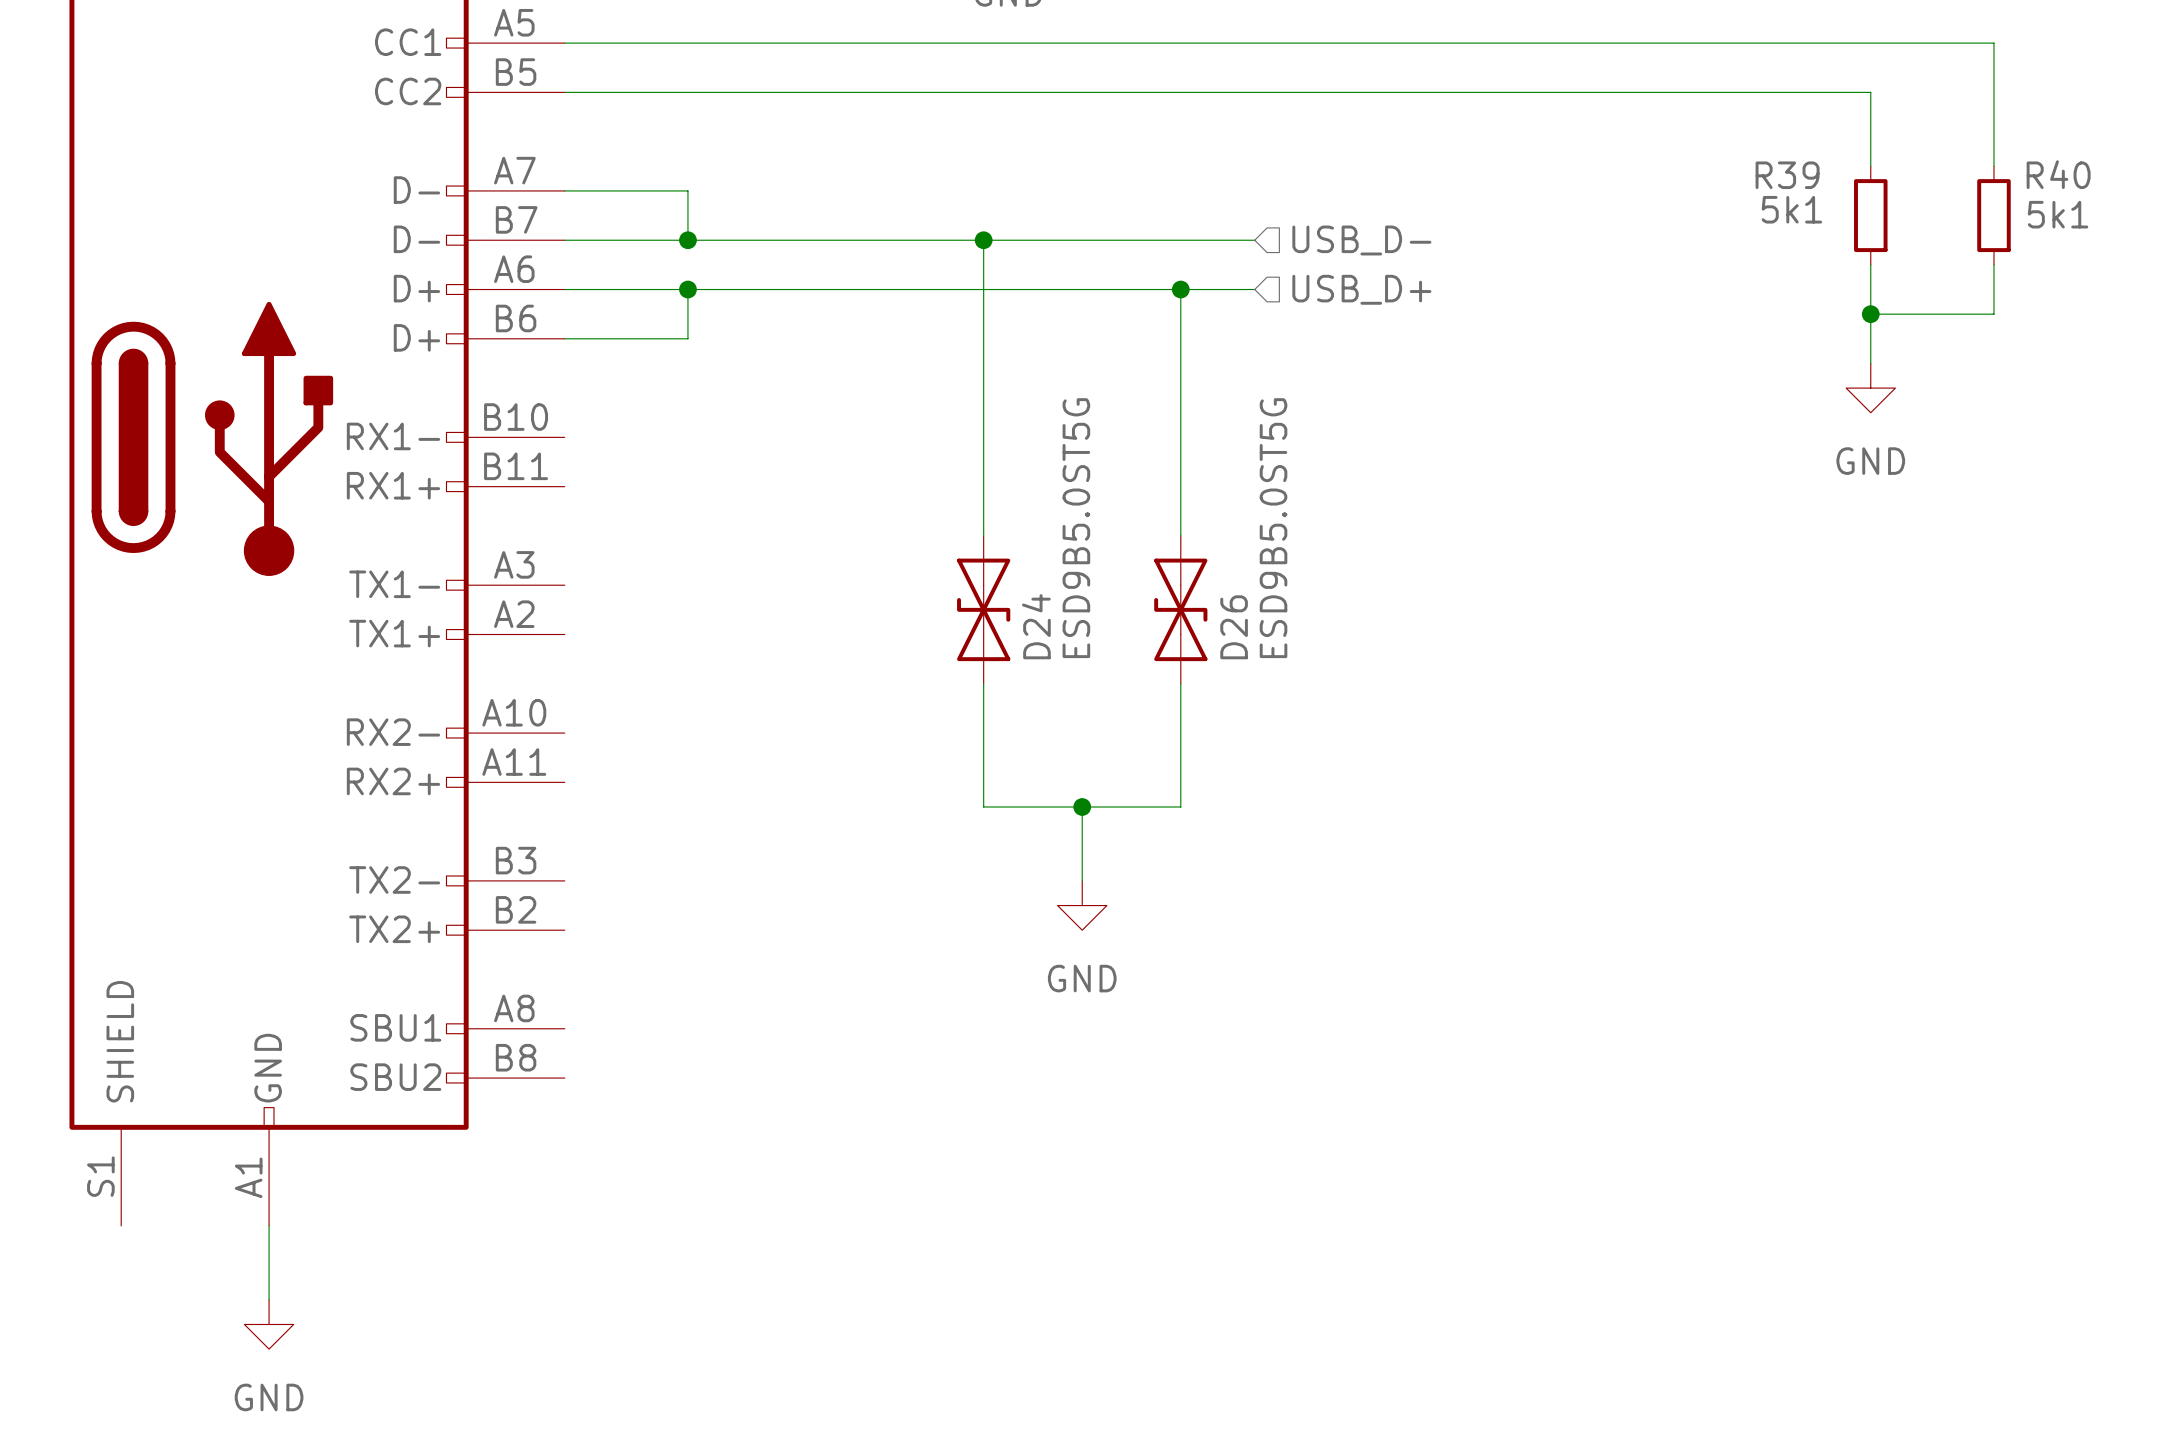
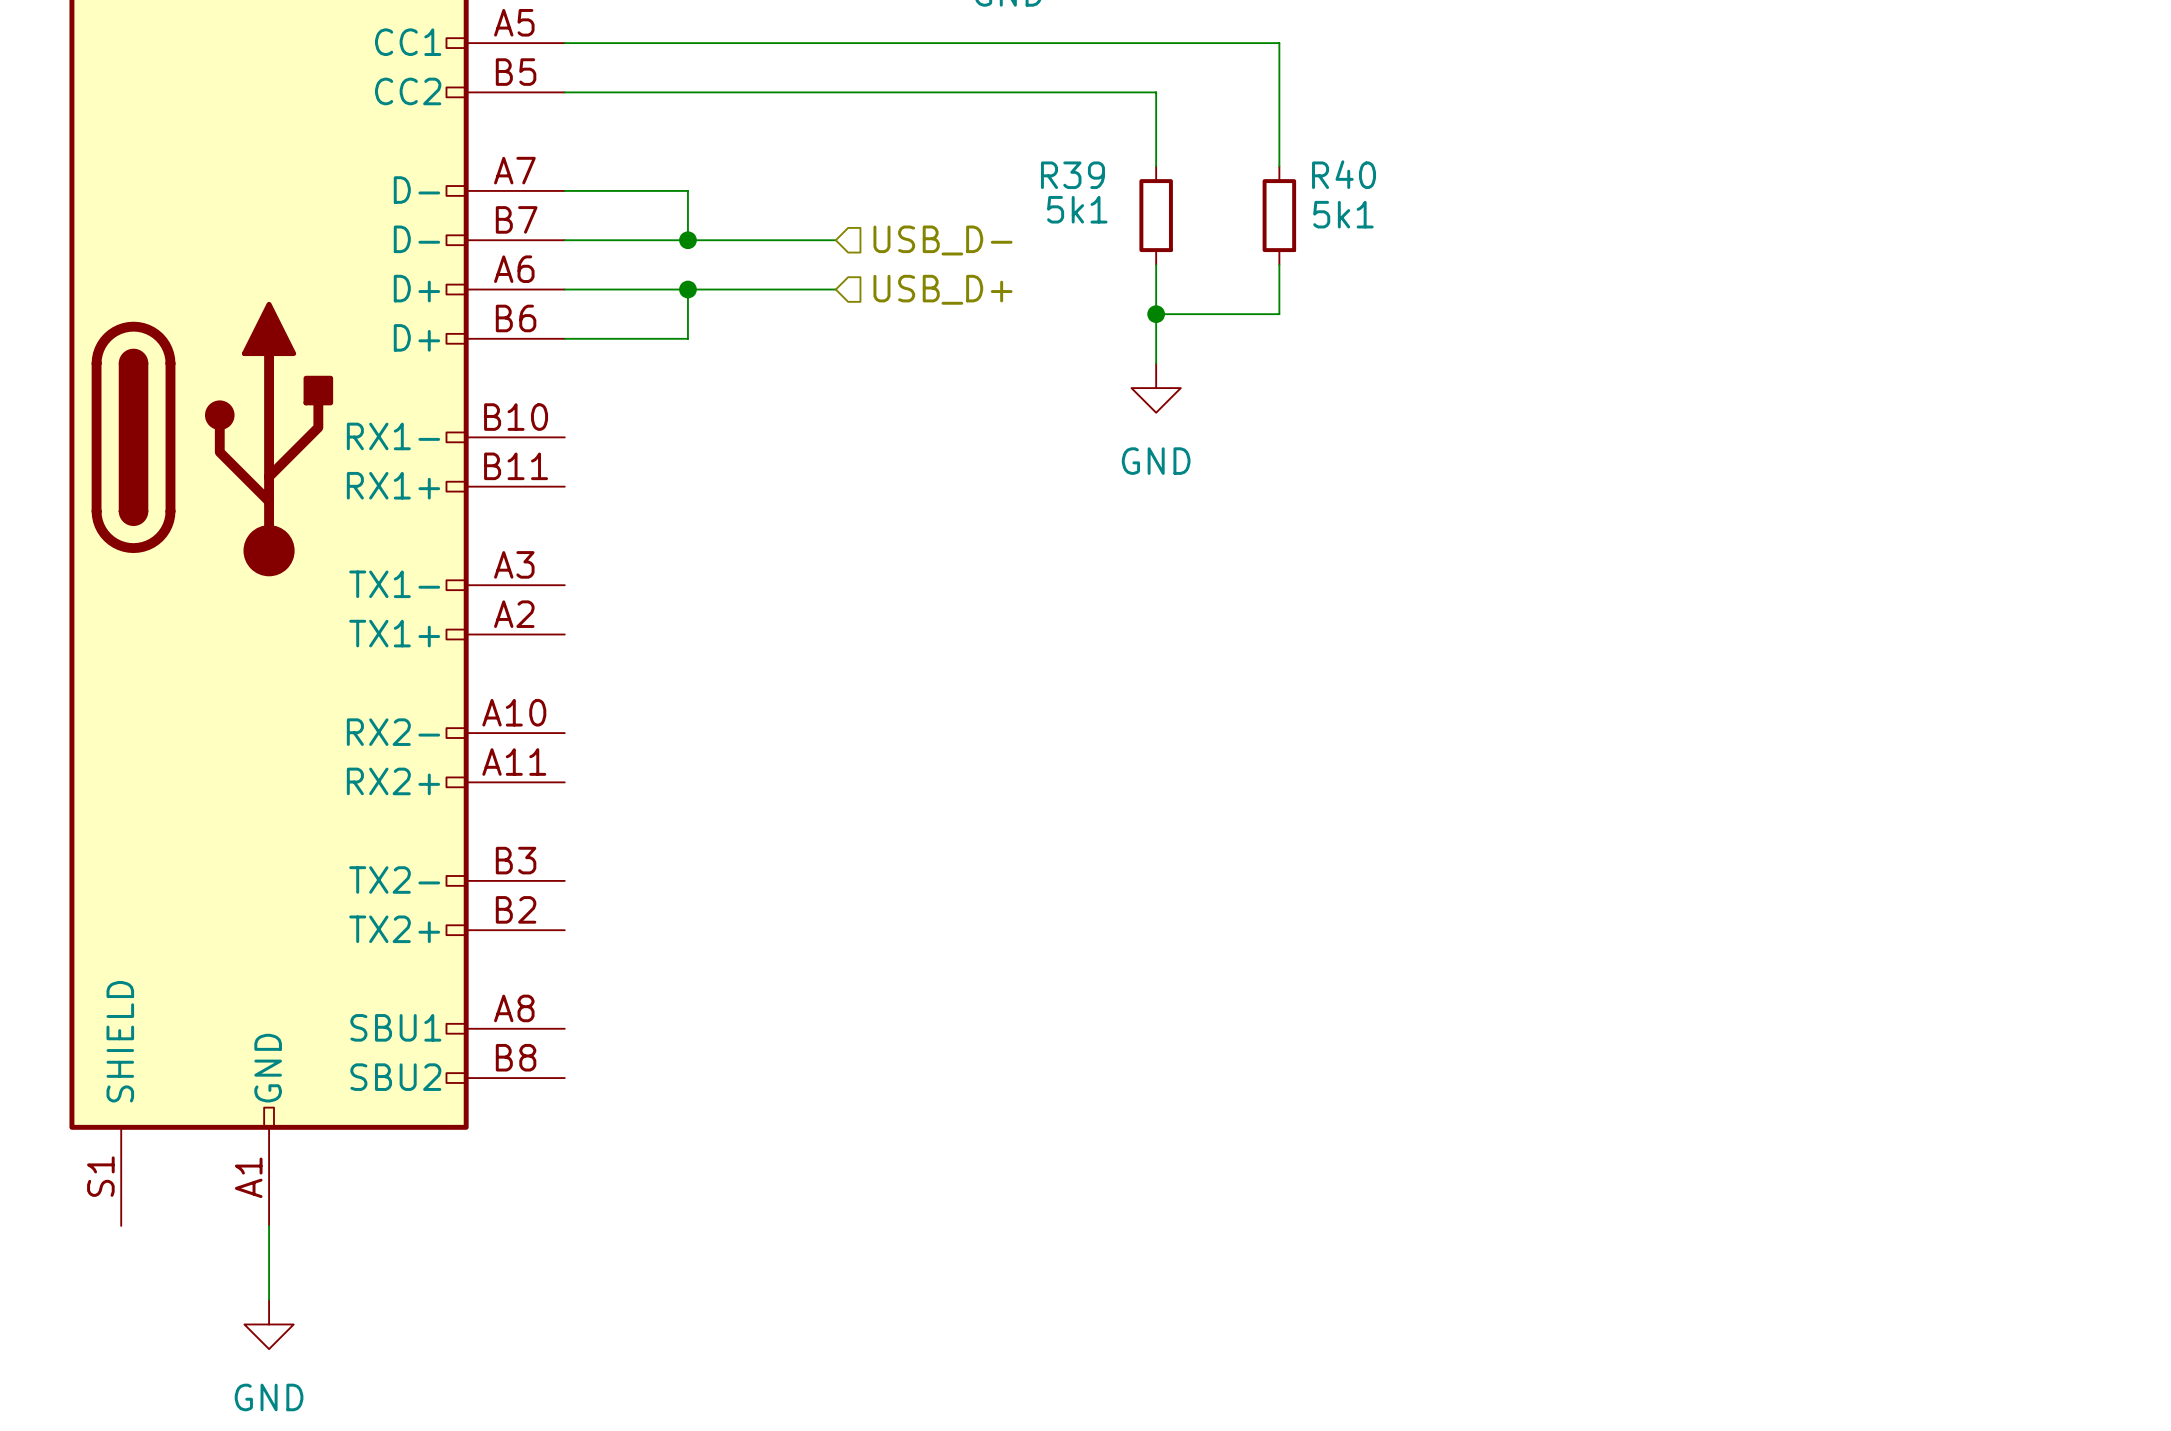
wire: (1279, 43) (1993, 43) (1993, 166) -> (1279, 43) (1279, 166)
wire: (1156, 92) (1870, 92) (1870, 166) -> (1156, 92) (1156, 166)
R39 position: (1870, 215) -> (1156, 215)
R40 position: (1993, 215) -> (1279, 215)
wire: (835, 240) (1254, 240) -> none
wire: (983, 240) (983, 535) -> none
junction: (983, 240) -> none
hierarchical label position: USB_D- (1361, 240) -> USB_D- (942, 240)
wire: none -> (1156, 264) (1156, 363)
wire: none -> (1279, 264) (1279, 314) (1156, 314)
wire: (1870, 264) (1870, 363) -> none
wire: (1993, 264) (1993, 314) (1870, 314) -> none
wire: (835, 289) (1254, 289) -> none
wire: (1180, 289) (1180, 535) -> none
junction position: (1180, 289) -> (1156, 314)
hierarchical label position: USB_D+ (1361, 289) -> USB_D+ (942, 289)
junction: (1870, 314) -> none
power symbol: none -> GND (1156, 388)
power symbol: GND (1870, 388) -> none
D24: ESD9B5.0ST5G (983, 609) -> none
D26: ESD9B5.0ST5G (1180, 609) -> none
wire: (983, 683) (983, 806) (1180, 806) (1180, 683) -> none
wire: (1082, 806) (1082, 880) -> none
junction: (1082, 806) -> none
power symbol: GND (1082, 905) -> none

